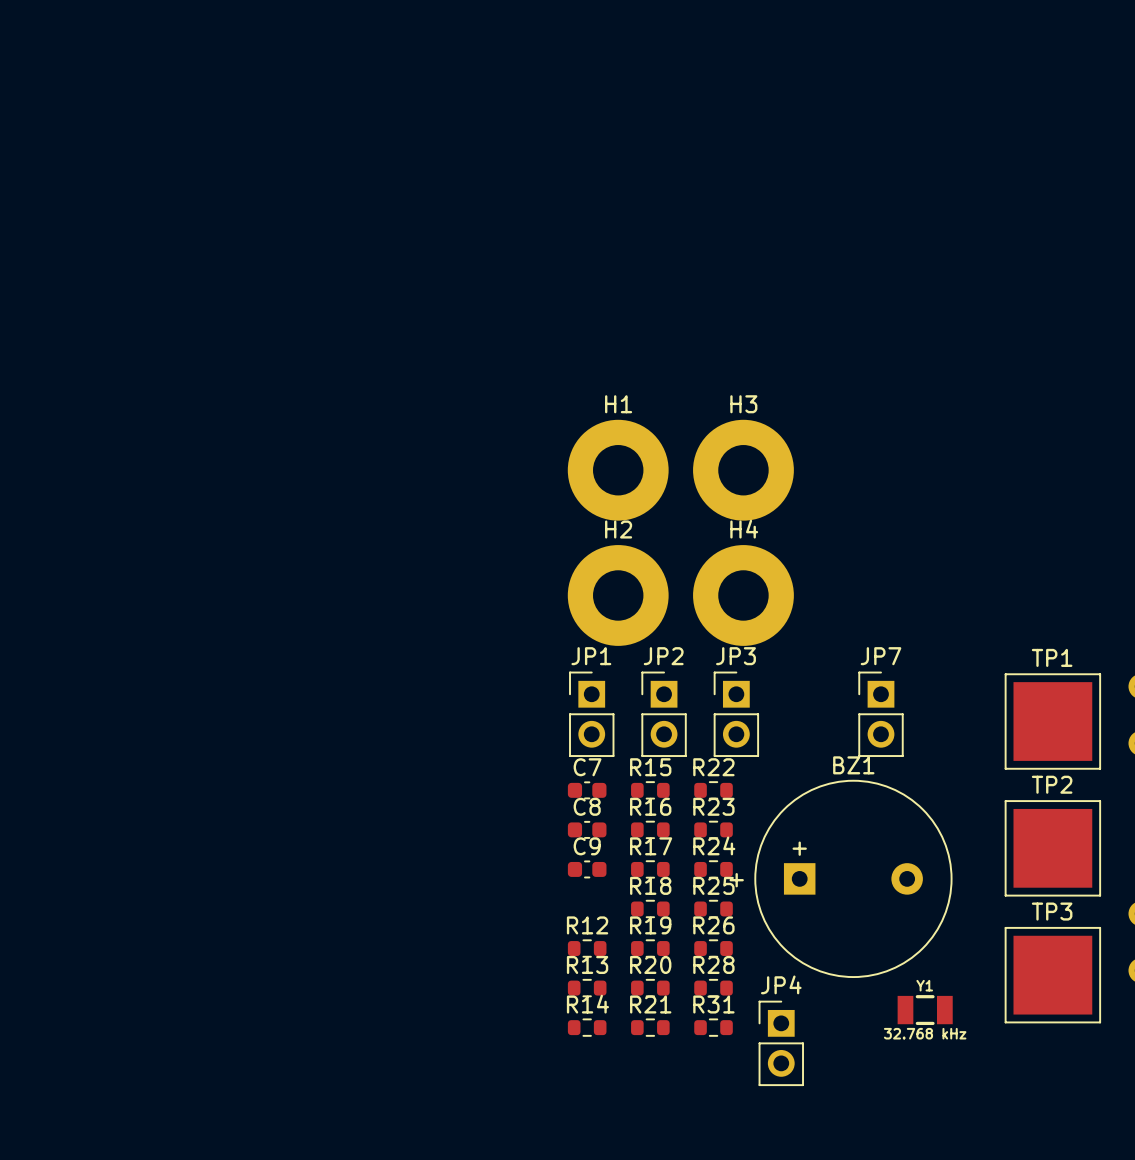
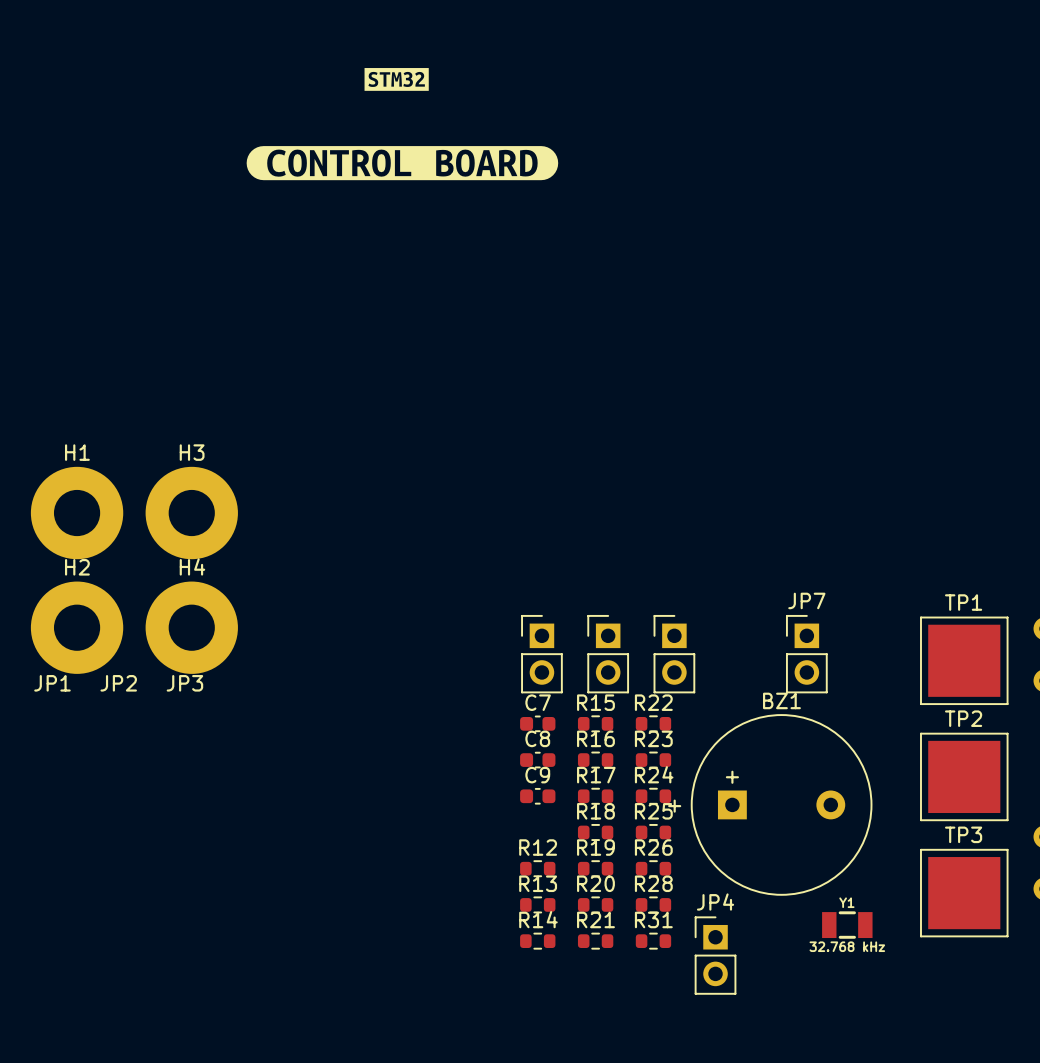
drawing: none -> [364, 68, 429, 91]
drawing: none -> [246, 146, 559, 181]
H1 position: (618, 470) -> (77, 513)
H3 position: (743, 470) -> (191, 513)
H2 position: (618, 595) -> (77, 627)
H4 position: (743, 595) -> (191, 627)
JP1 name position: JP1 (591, 656) -> JP1 (52, 683)
JP2 name position: JP2 (663, 656) -> JP2 (118, 683)
JP3 name position: JP3 (736, 656) -> JP3 (184, 683)

